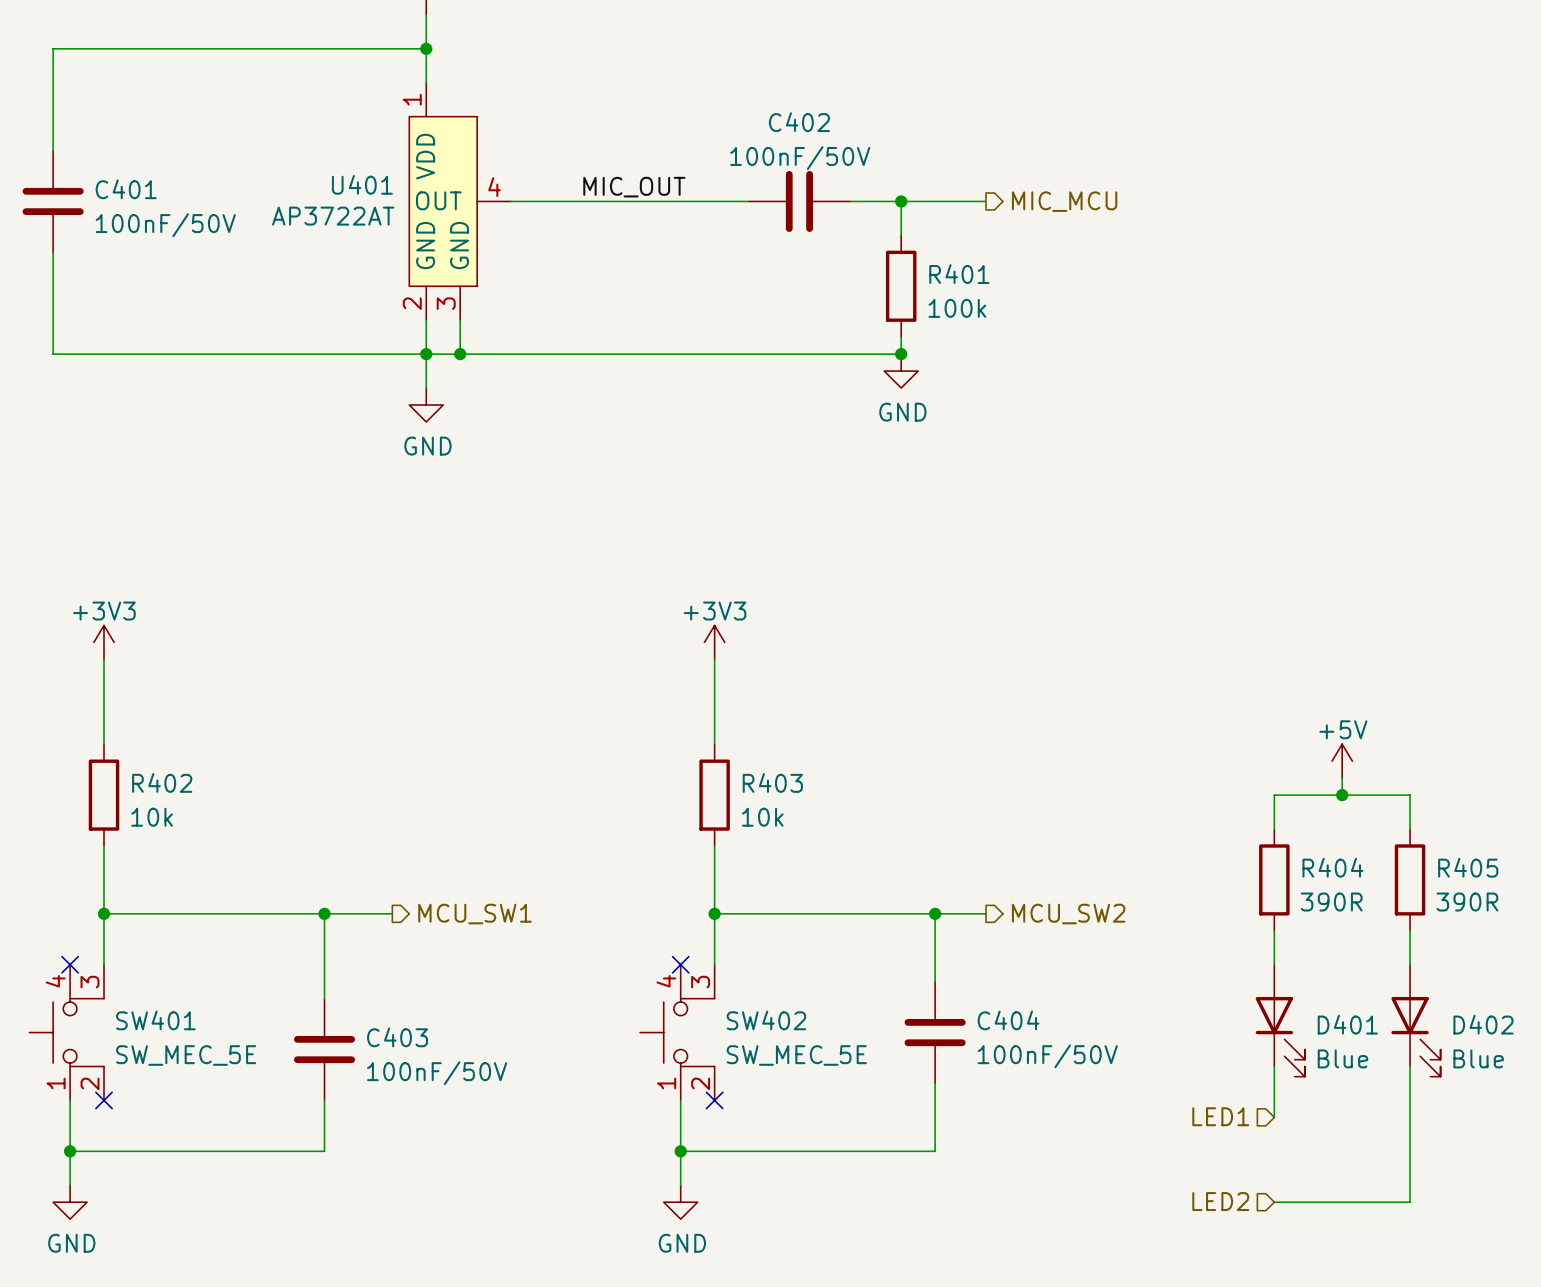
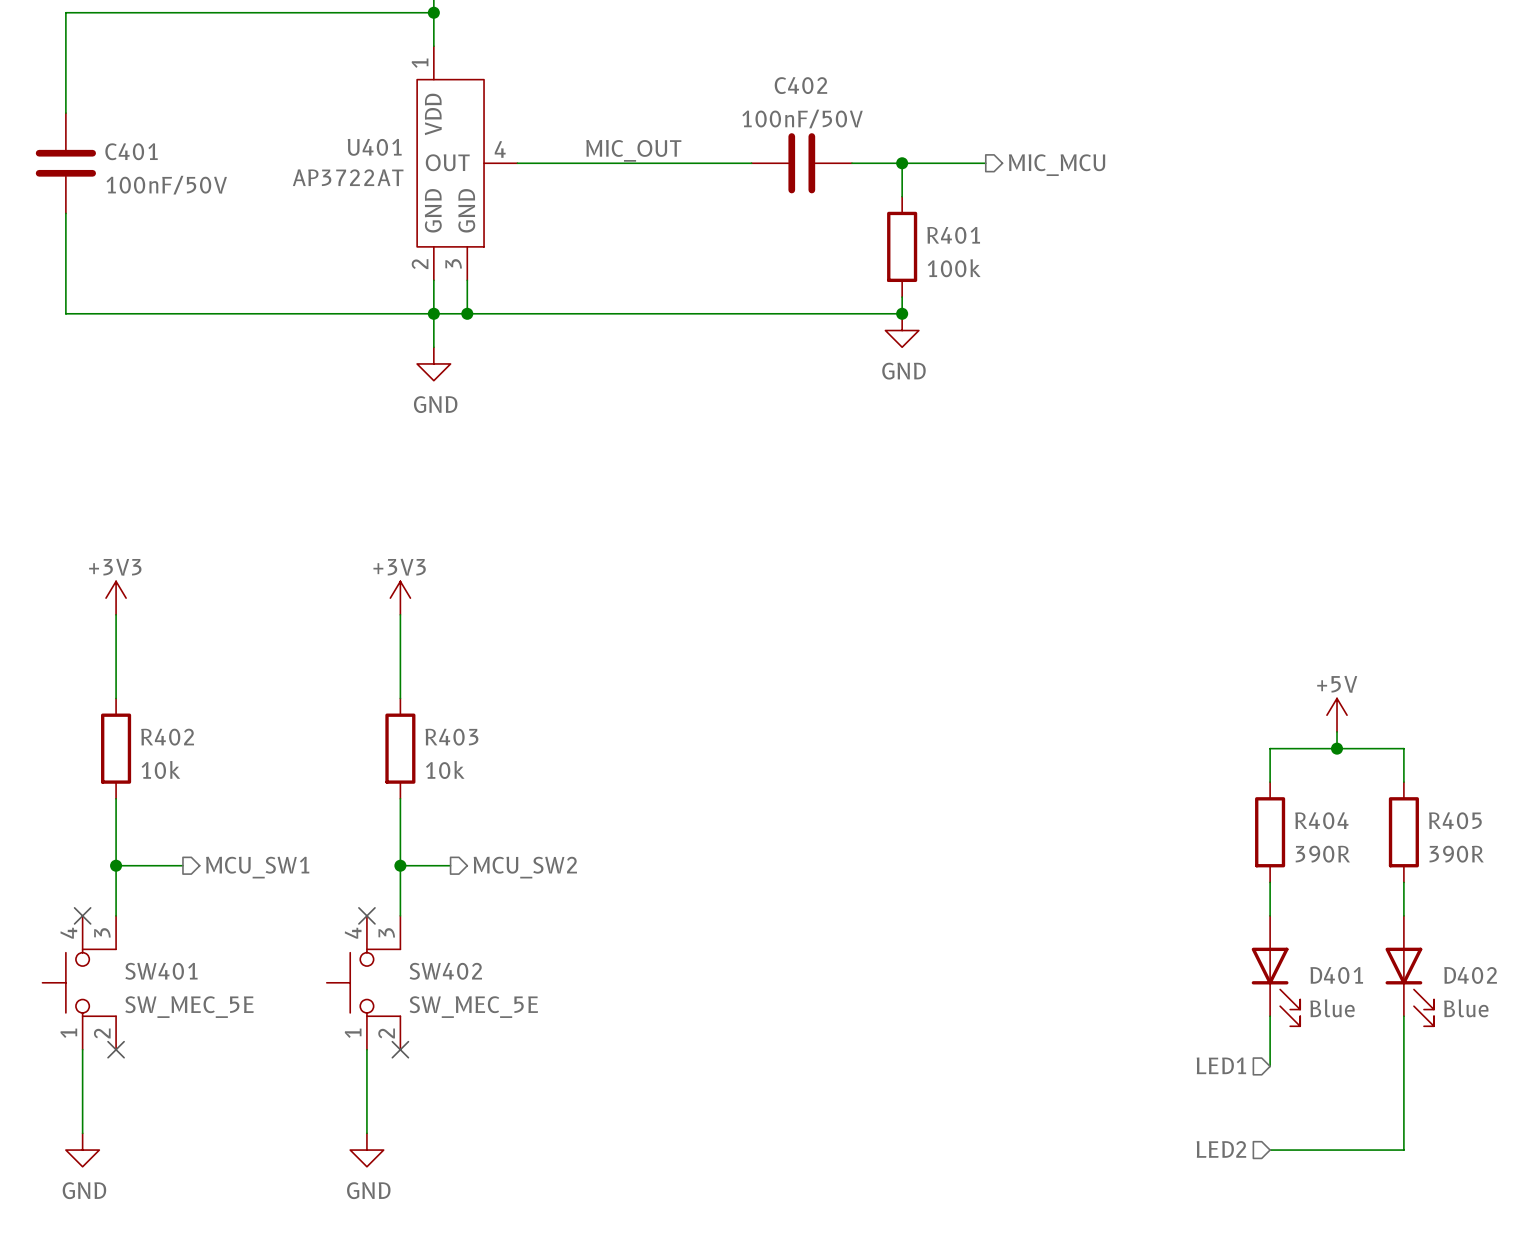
power symbol position: +3V3 (714, 642) -> +3V3 (400, 598)
wire: (714, 659) (714, 744) -> (400, 614) (400, 698)
R403 position: (714, 795) -> (400, 748)
wire: (714, 846) (714, 964) -> (400, 798) (400, 915)
wire: (171, 913) (392, 913) -> (450, 865) (400, 865)
wire: (324, 913) (324, 998) -> none
junction position: (324, 913) -> (400, 865)
wire: (714, 913) (986, 913) -> none
junction: (714, 913) -> none
wire: (935, 913) (935, 981) -> none
junction: (935, 913) -> none
hierarchical label position: MCU_SW1 (474, 914) -> MCU_SW1 (257, 867)
hierarchical label: none -> MCU_SW2 (525, 867)
hierarchical label: MCU_SW2 (1068, 914) -> none
no-connect mark: none -> (366, 915)
no-connect mark: (680, 964) -> none
SW402 position: (677, 1032) -> (363, 982)
C404: 100nF/50V (935, 1032) -> none
C403: 100nF/50V (324, 1049) -> none
wire: (935, 1083) (935, 1151) (680, 1151) -> none
wire: (324, 1100) (324, 1151) (70, 1151) -> none
no-connect mark: none -> (400, 1049)
wire: (680, 1100) (680, 1185) -> (366, 1049) (366, 1133)
no-connect mark: (714, 1100) -> none
junction: (70, 1151) -> none
junction: (680, 1151) -> none
power symbol position: GND (680, 1202) -> GND (366, 1150)

